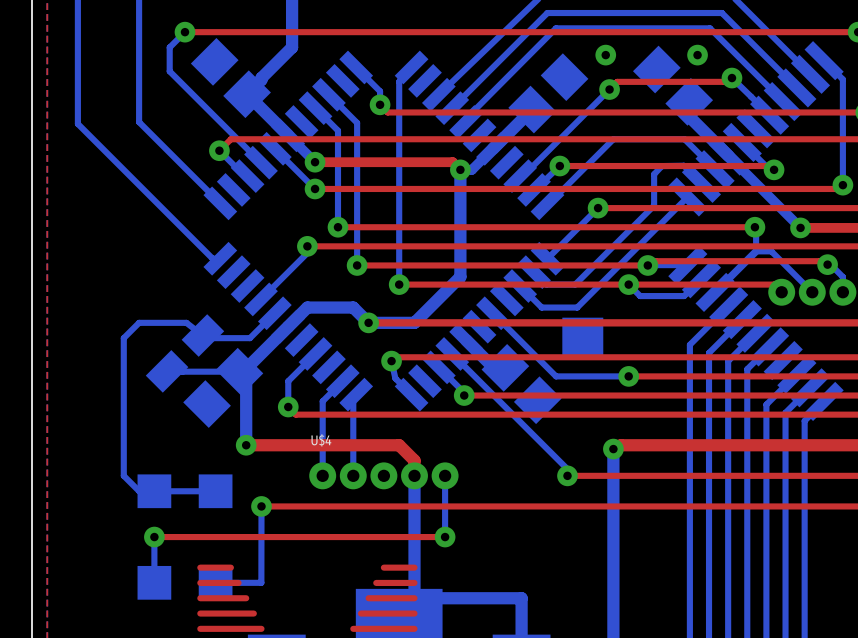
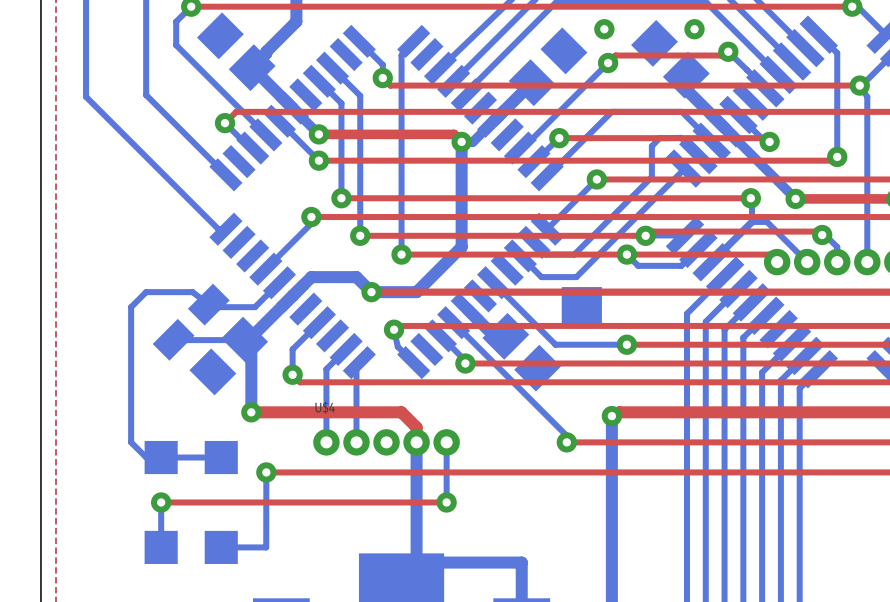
top track: (200, 567) (230, 567) -> none
top track: (383, 567) (414, 567) -> none
top track: (200, 582) (238, 582) -> none
top track: (376, 582) (414, 582) -> none
top track: (200, 598) (246, 598) -> none
top track: (368, 598) (414, 598) -> none
top track: (200, 613) (253, 613) -> none
top track: (360, 613) (414, 613) -> none
top track: (200, 628) (261, 628) -> none
top track: (353, 628) (414, 628) -> none

